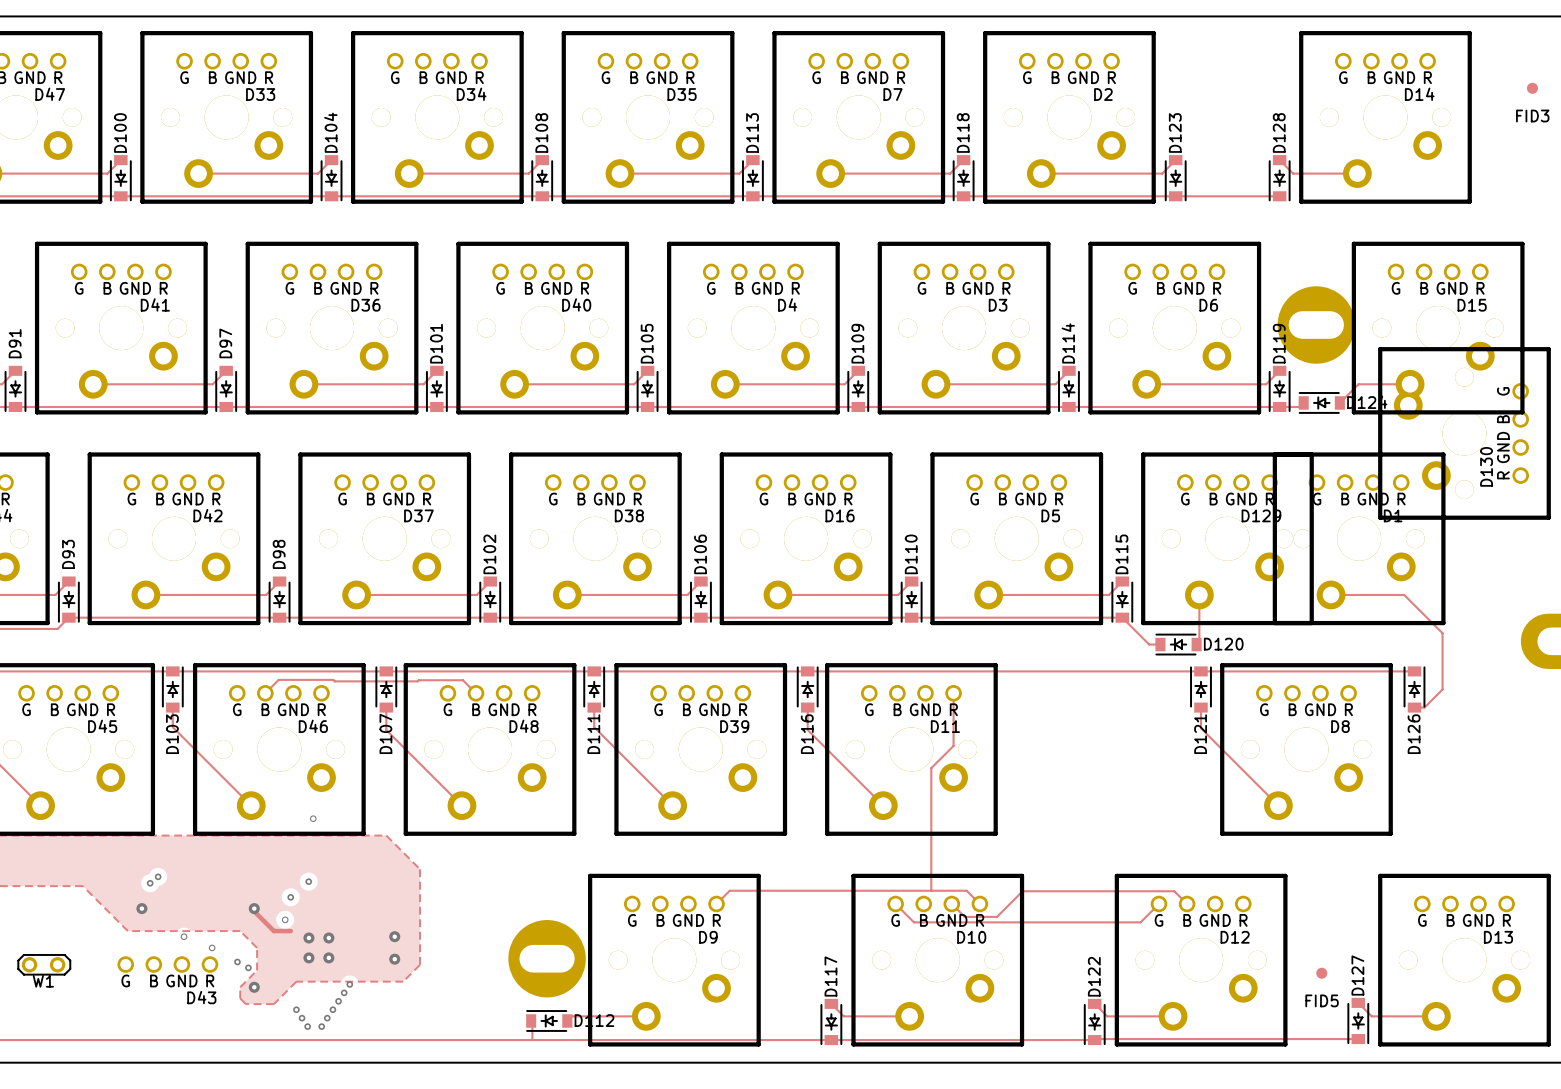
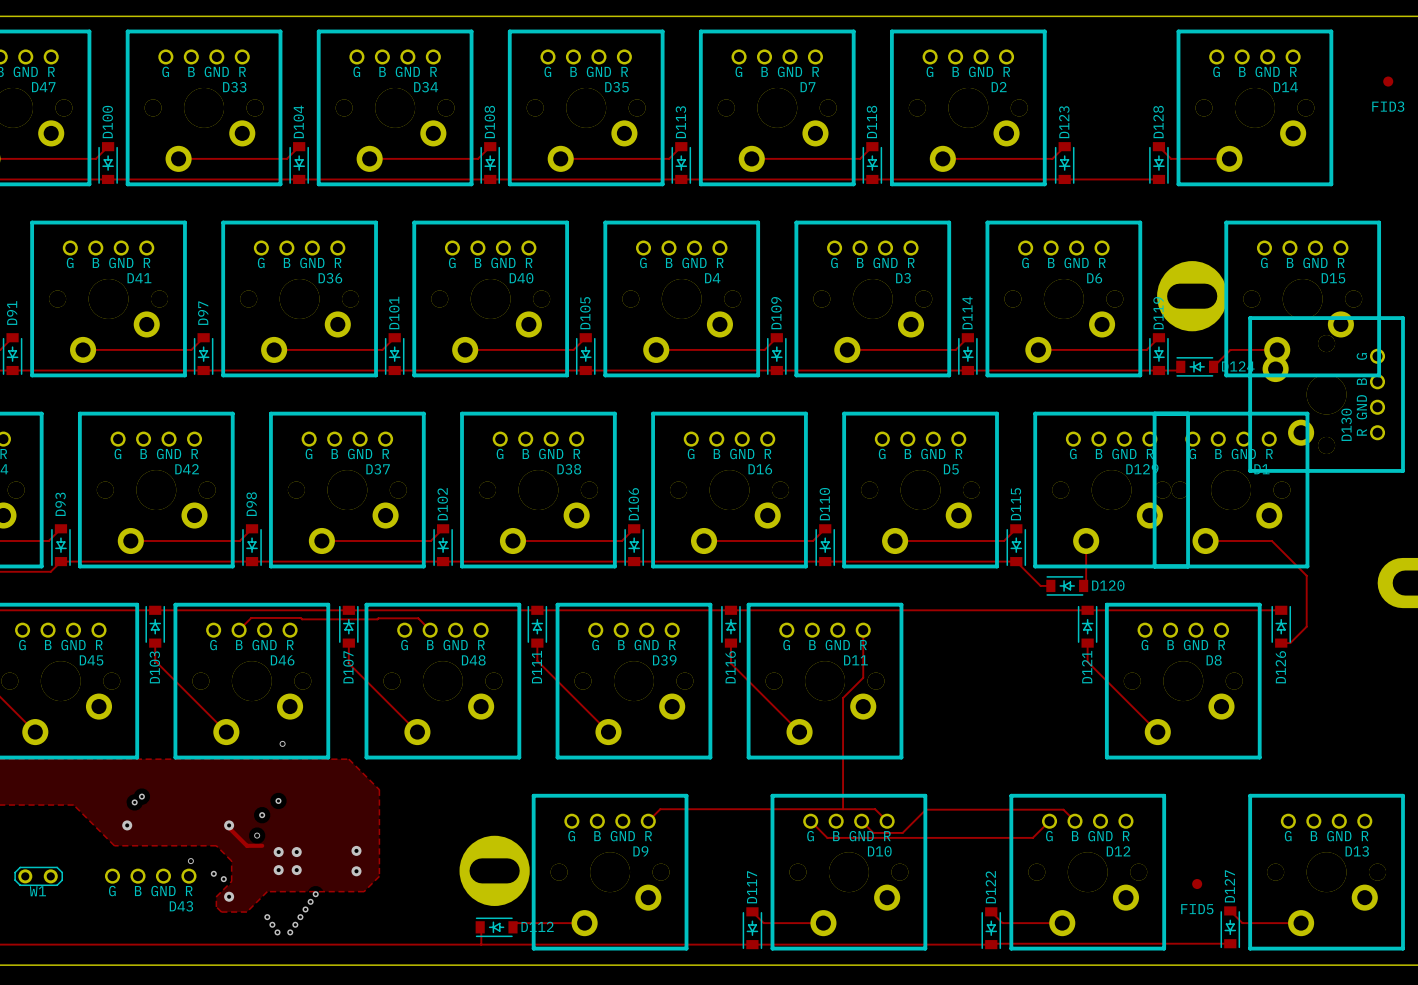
via: (184, 936) -> none

